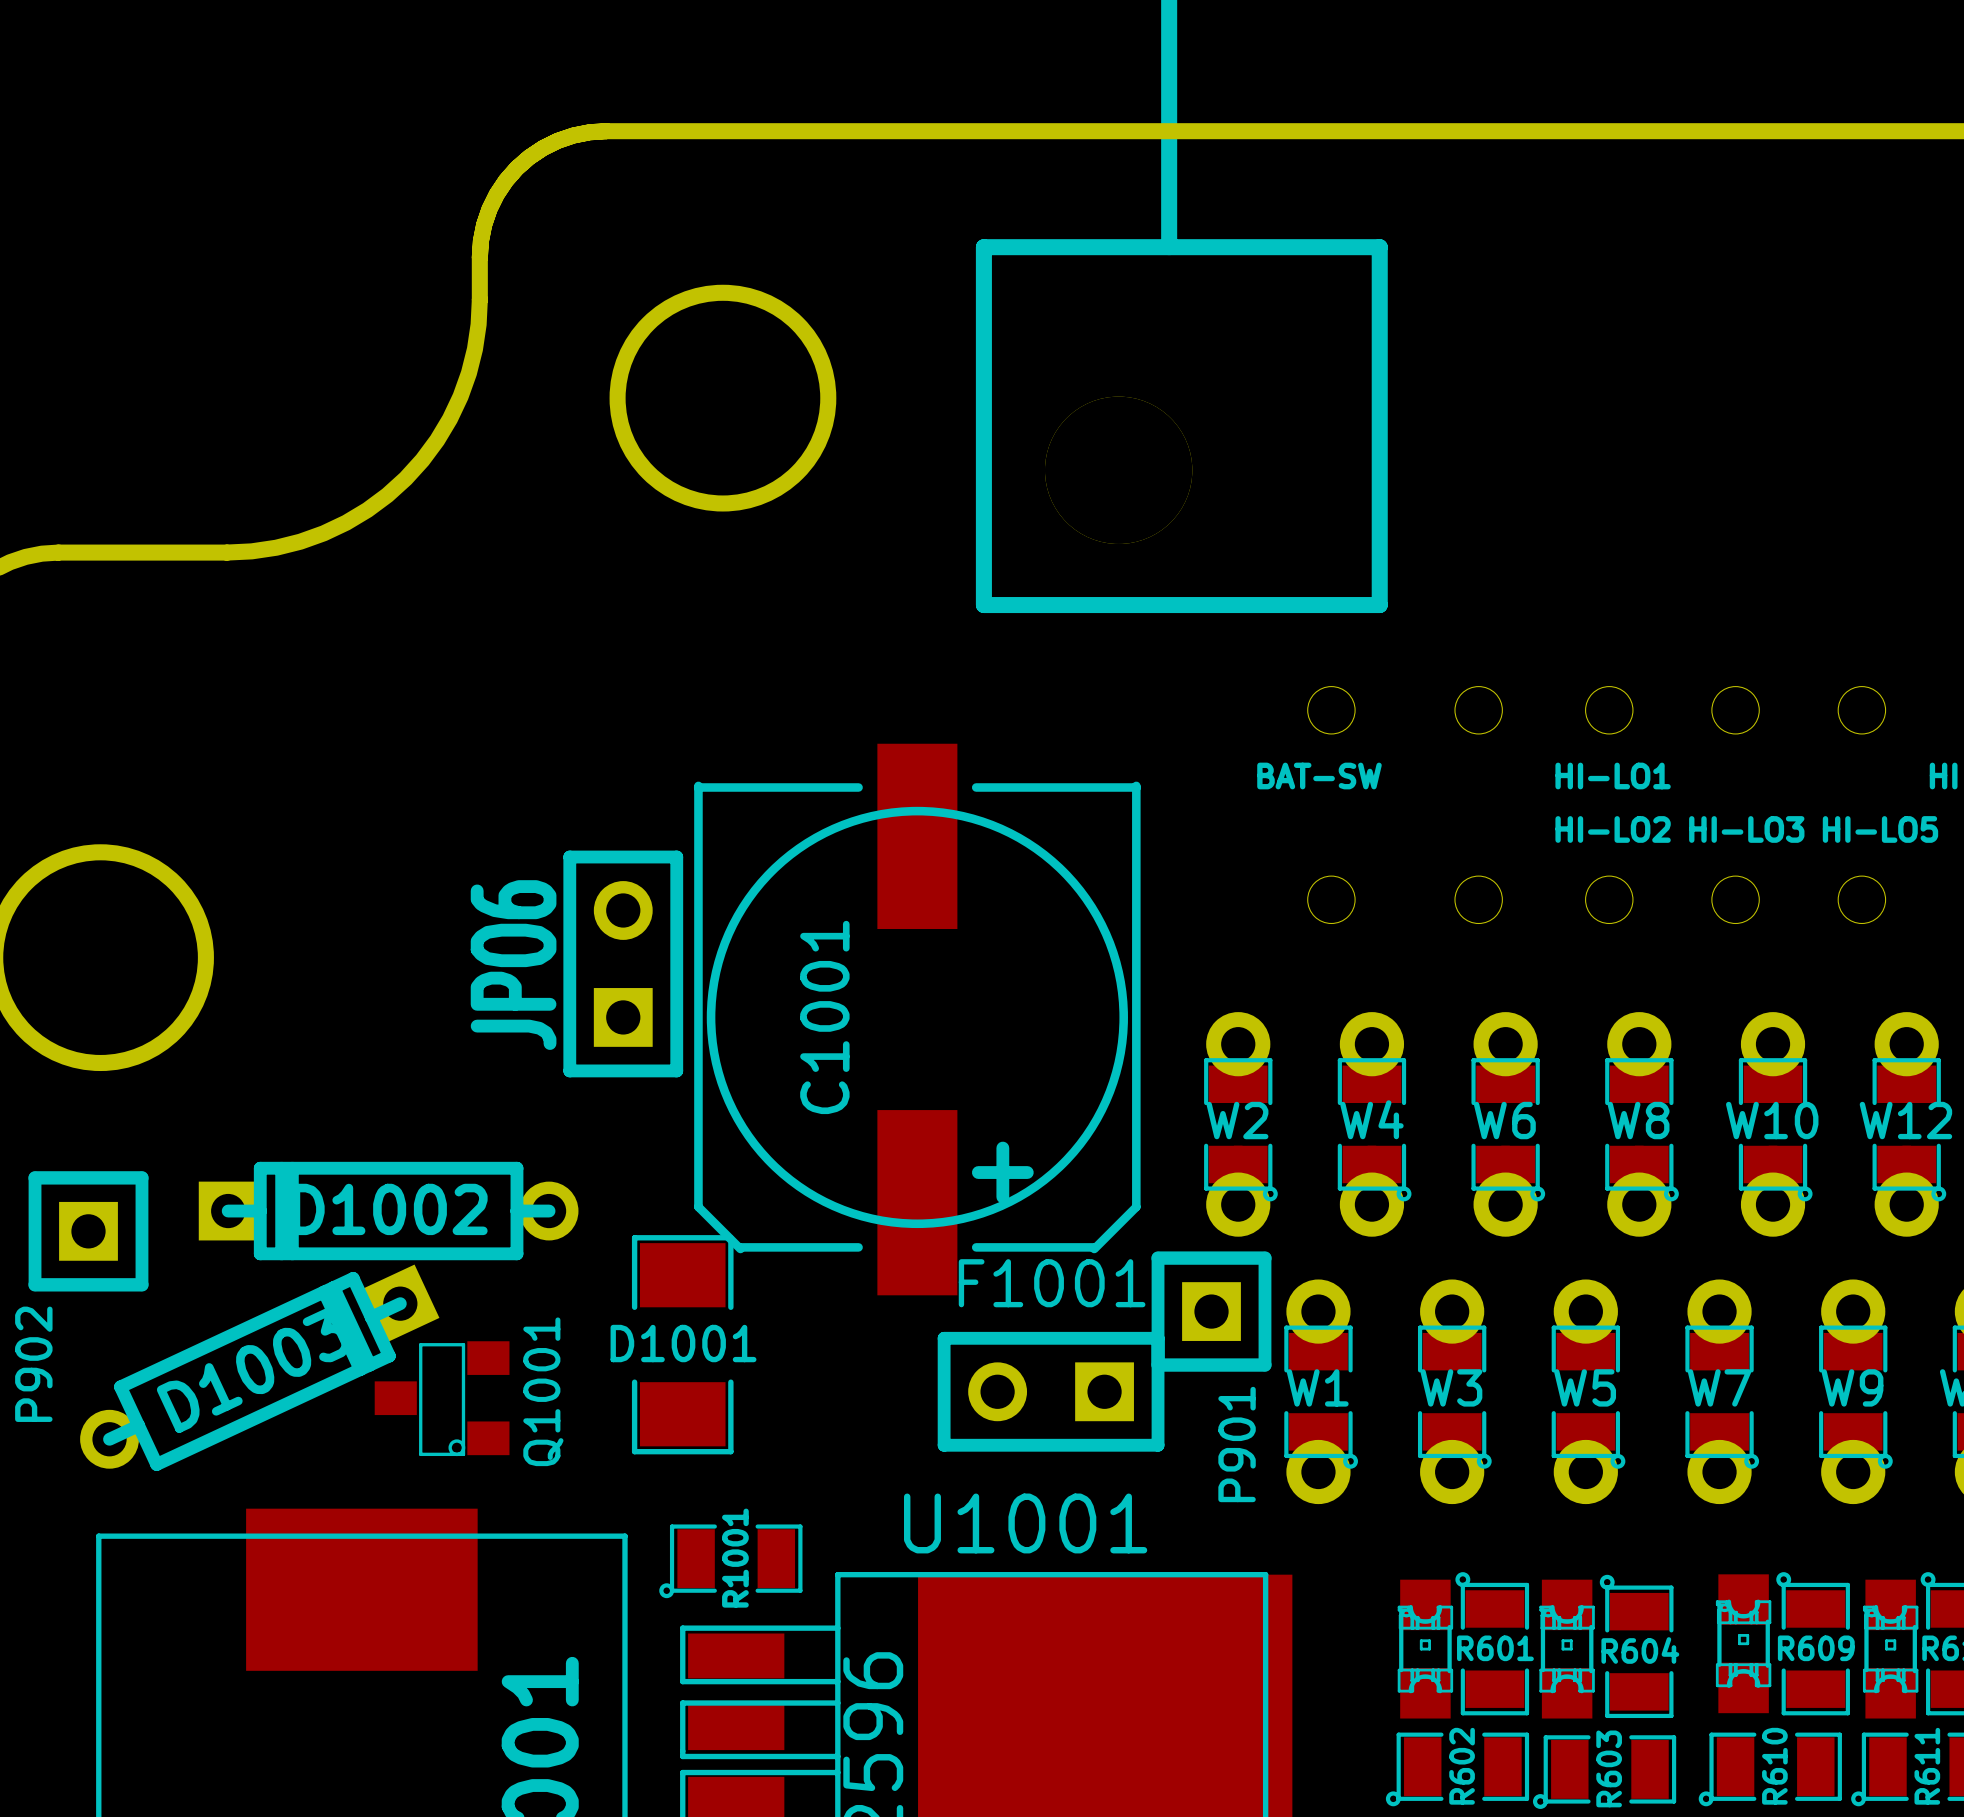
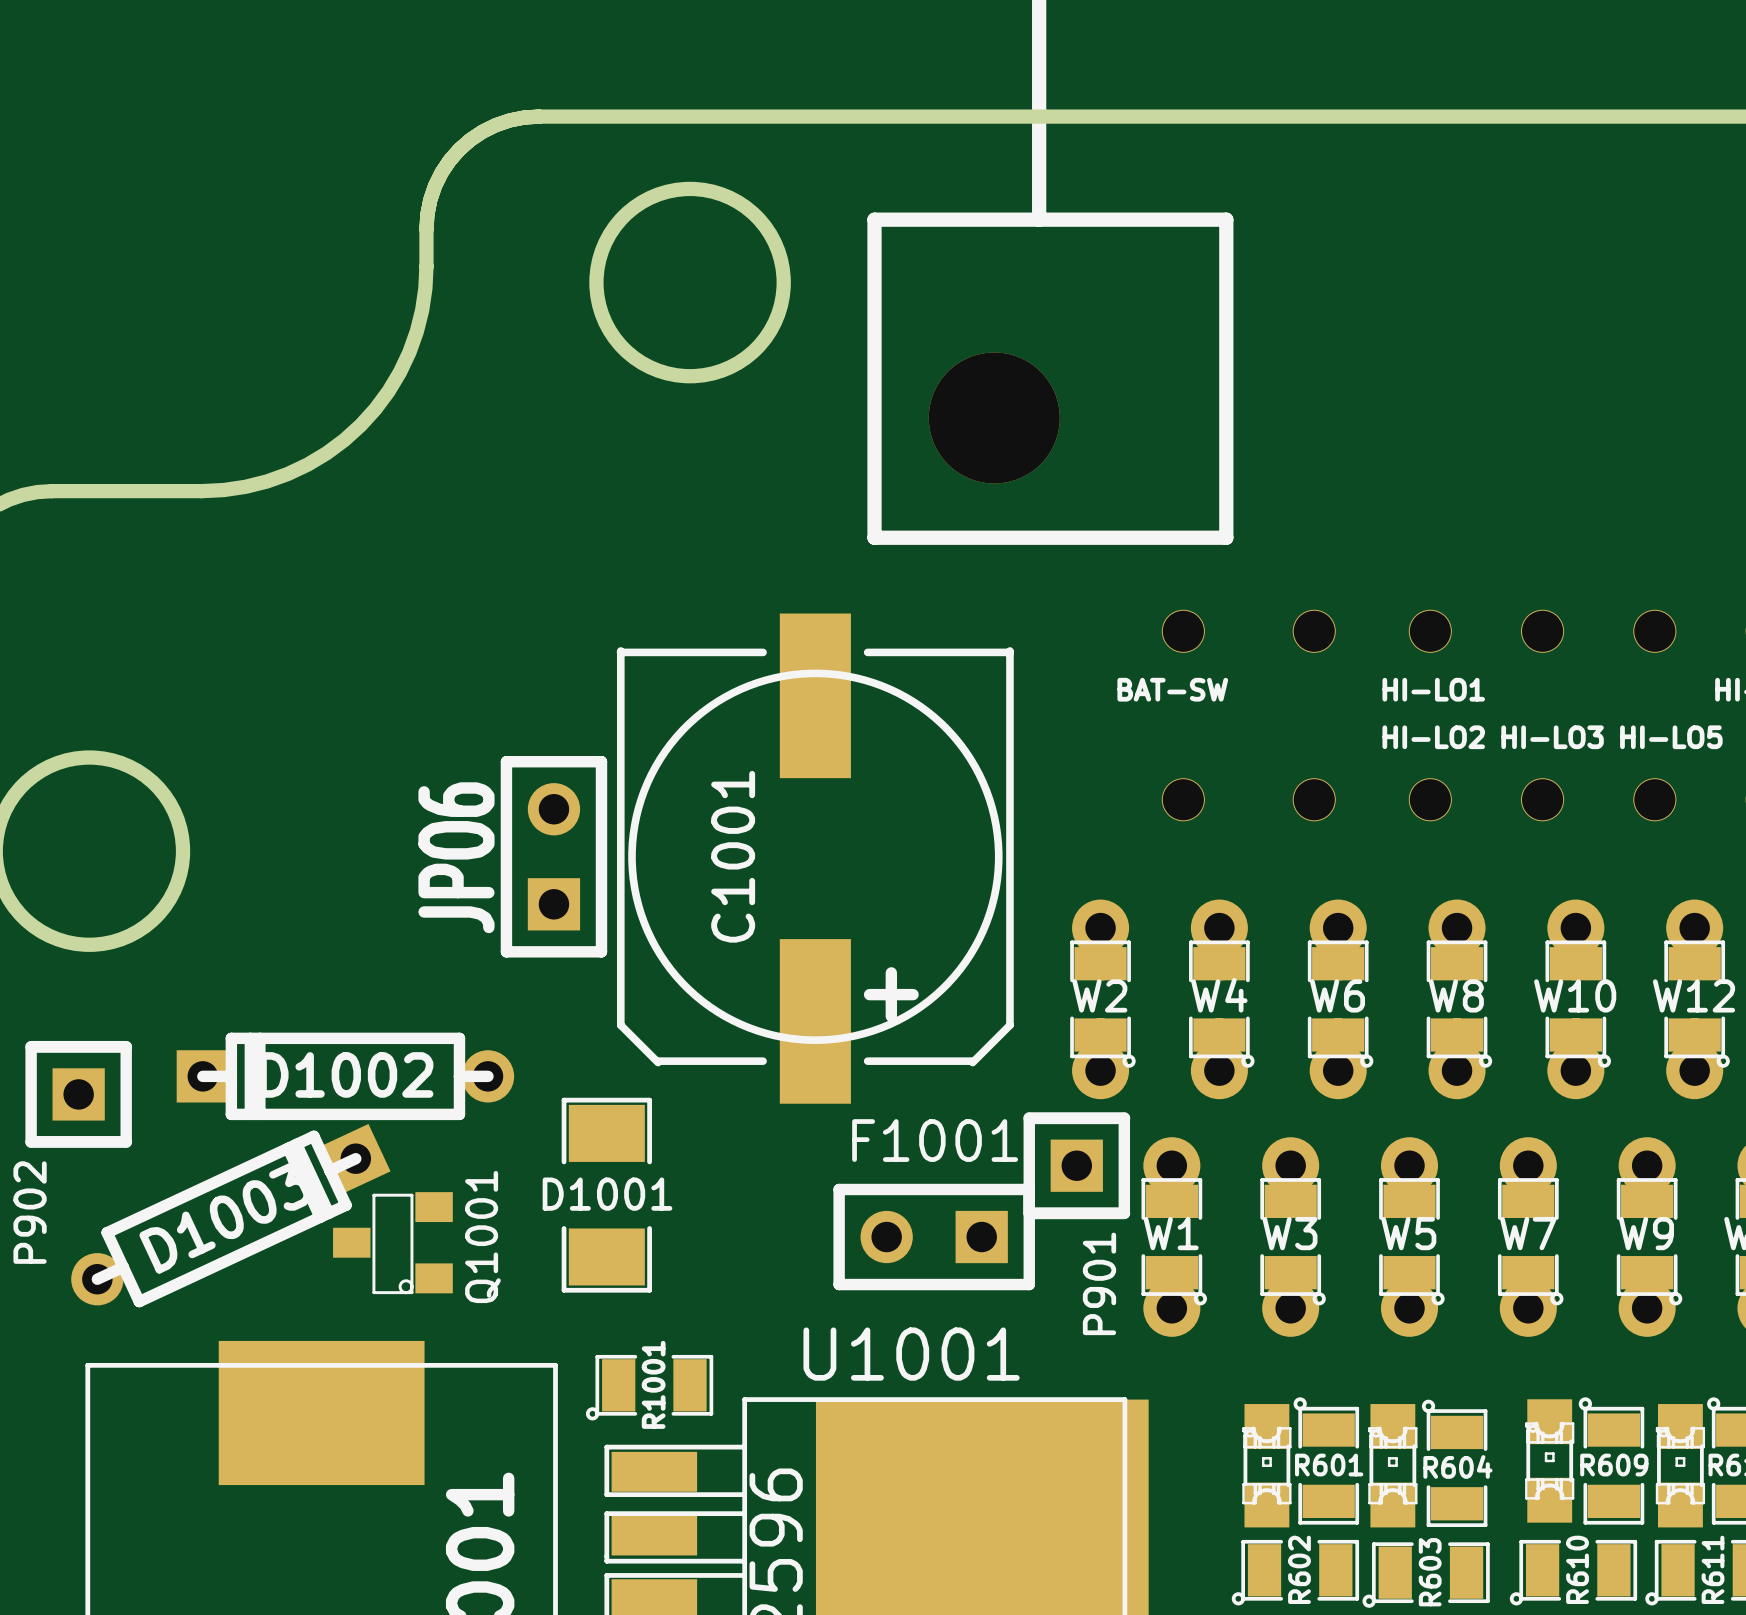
round board edge position: (722, 398) -> (690, 282)
C1001 position: (917, 1019) -> (815, 858)

